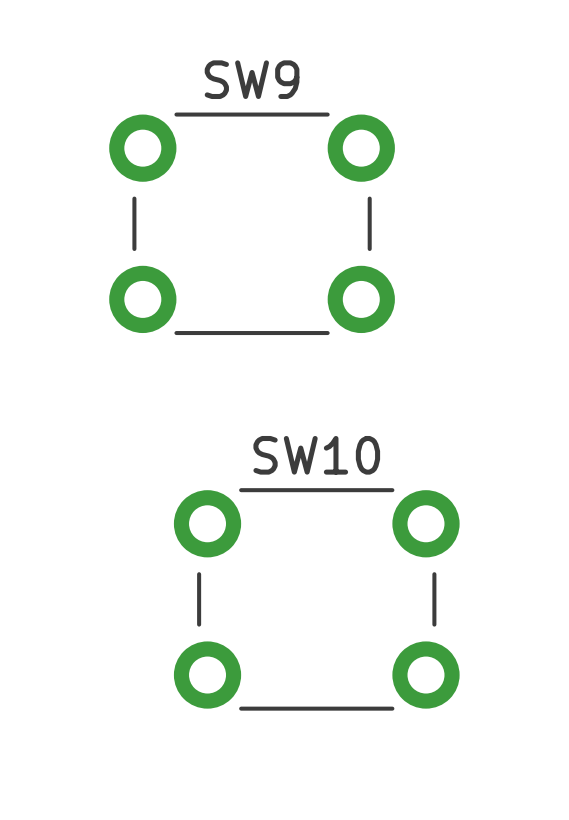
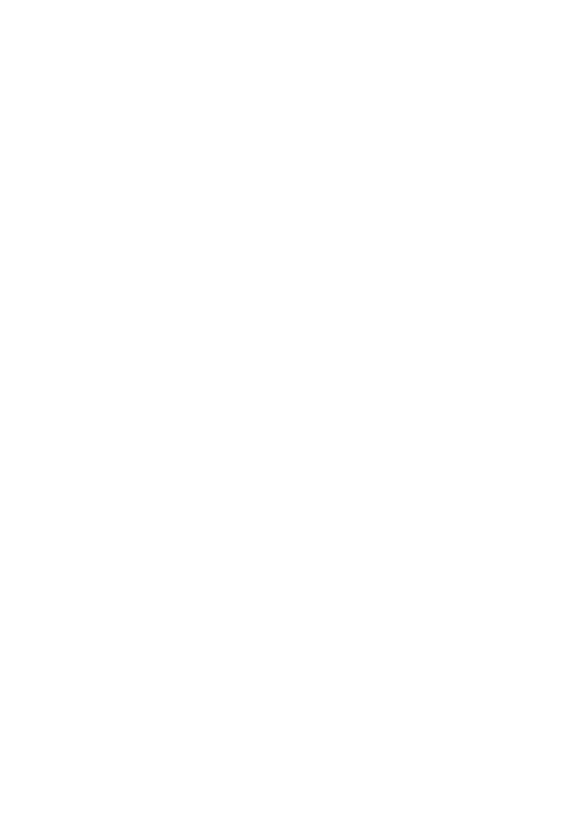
SW9: (252, 223) -> none
SW10: (316, 599) -> none

